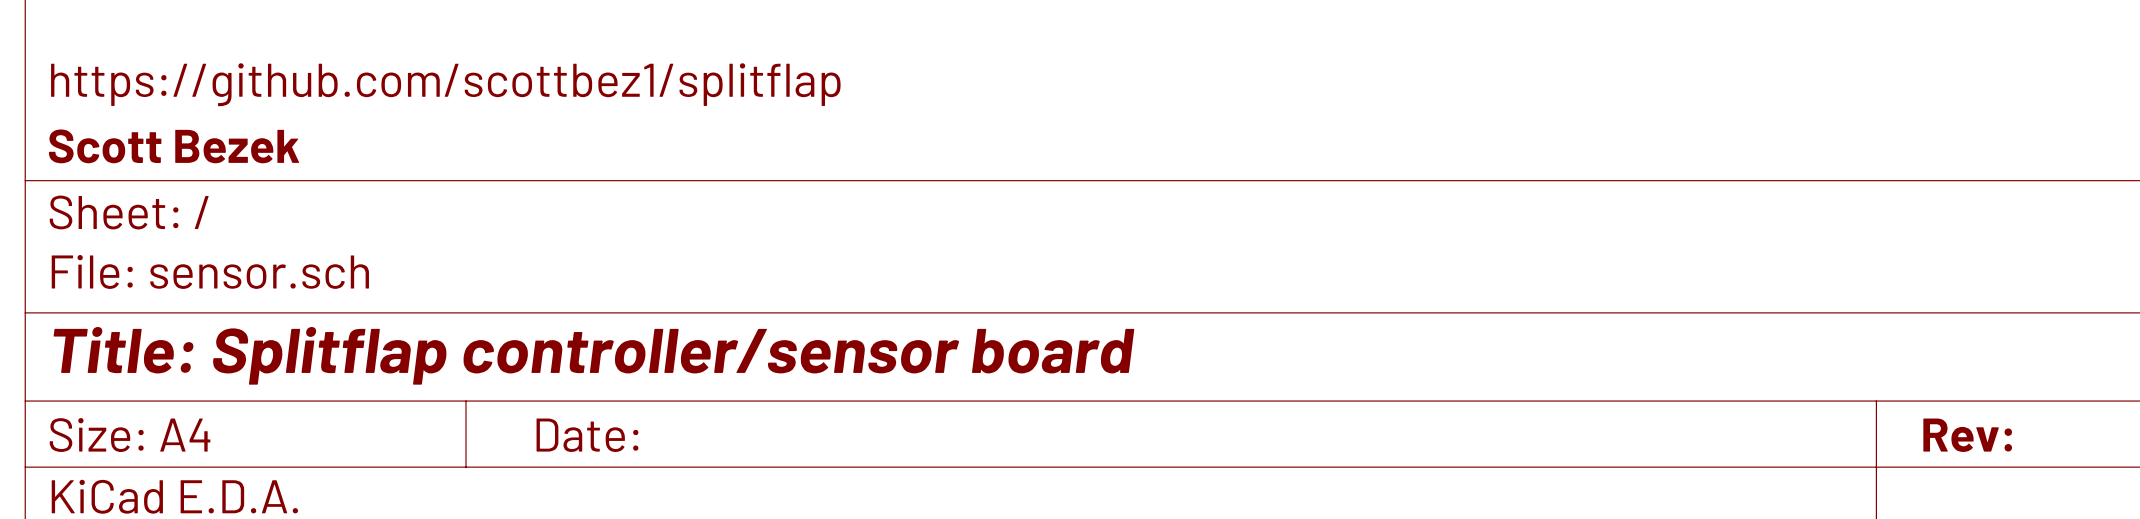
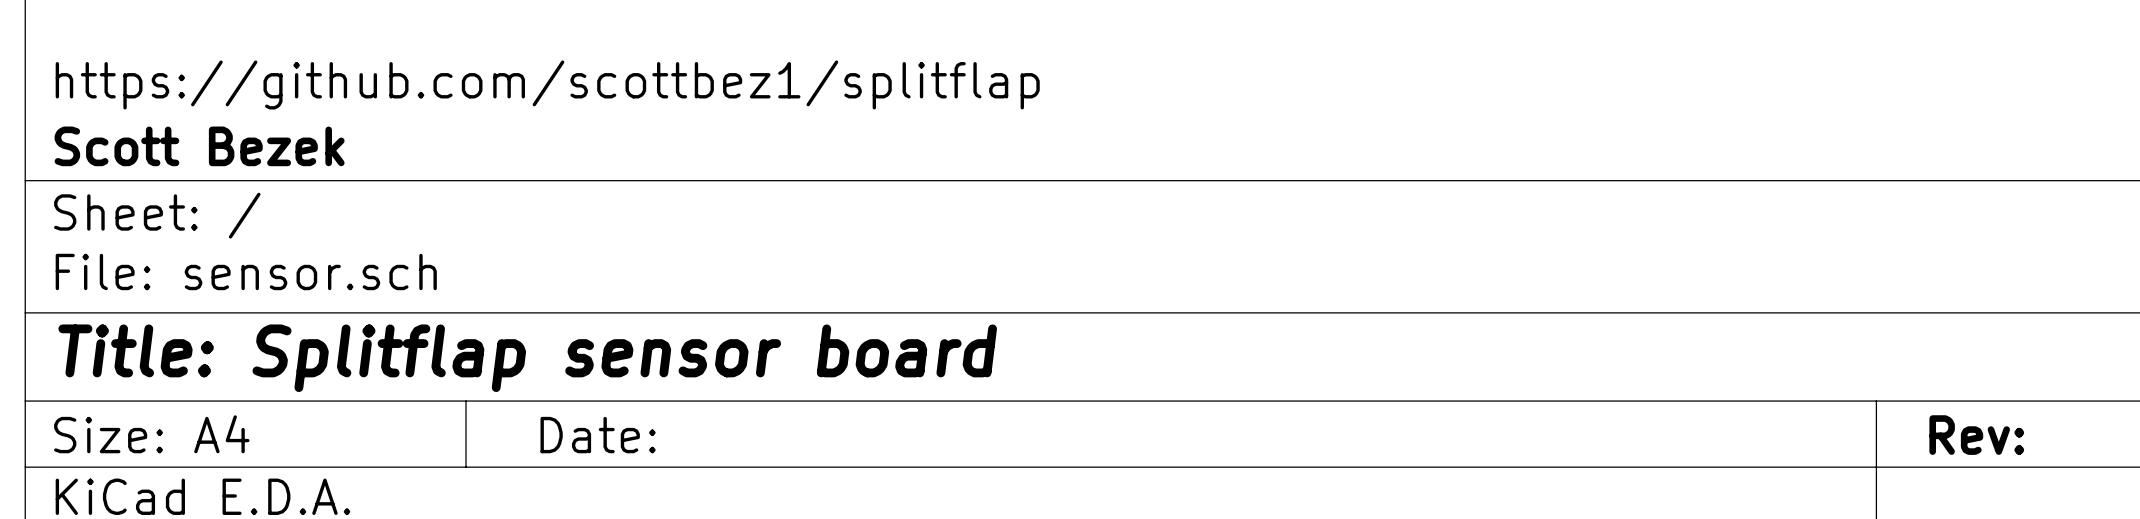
title block: Title: Splitflap controller/sensor board (593, 355) -> Title: Splitflap sensor board (527, 358)

